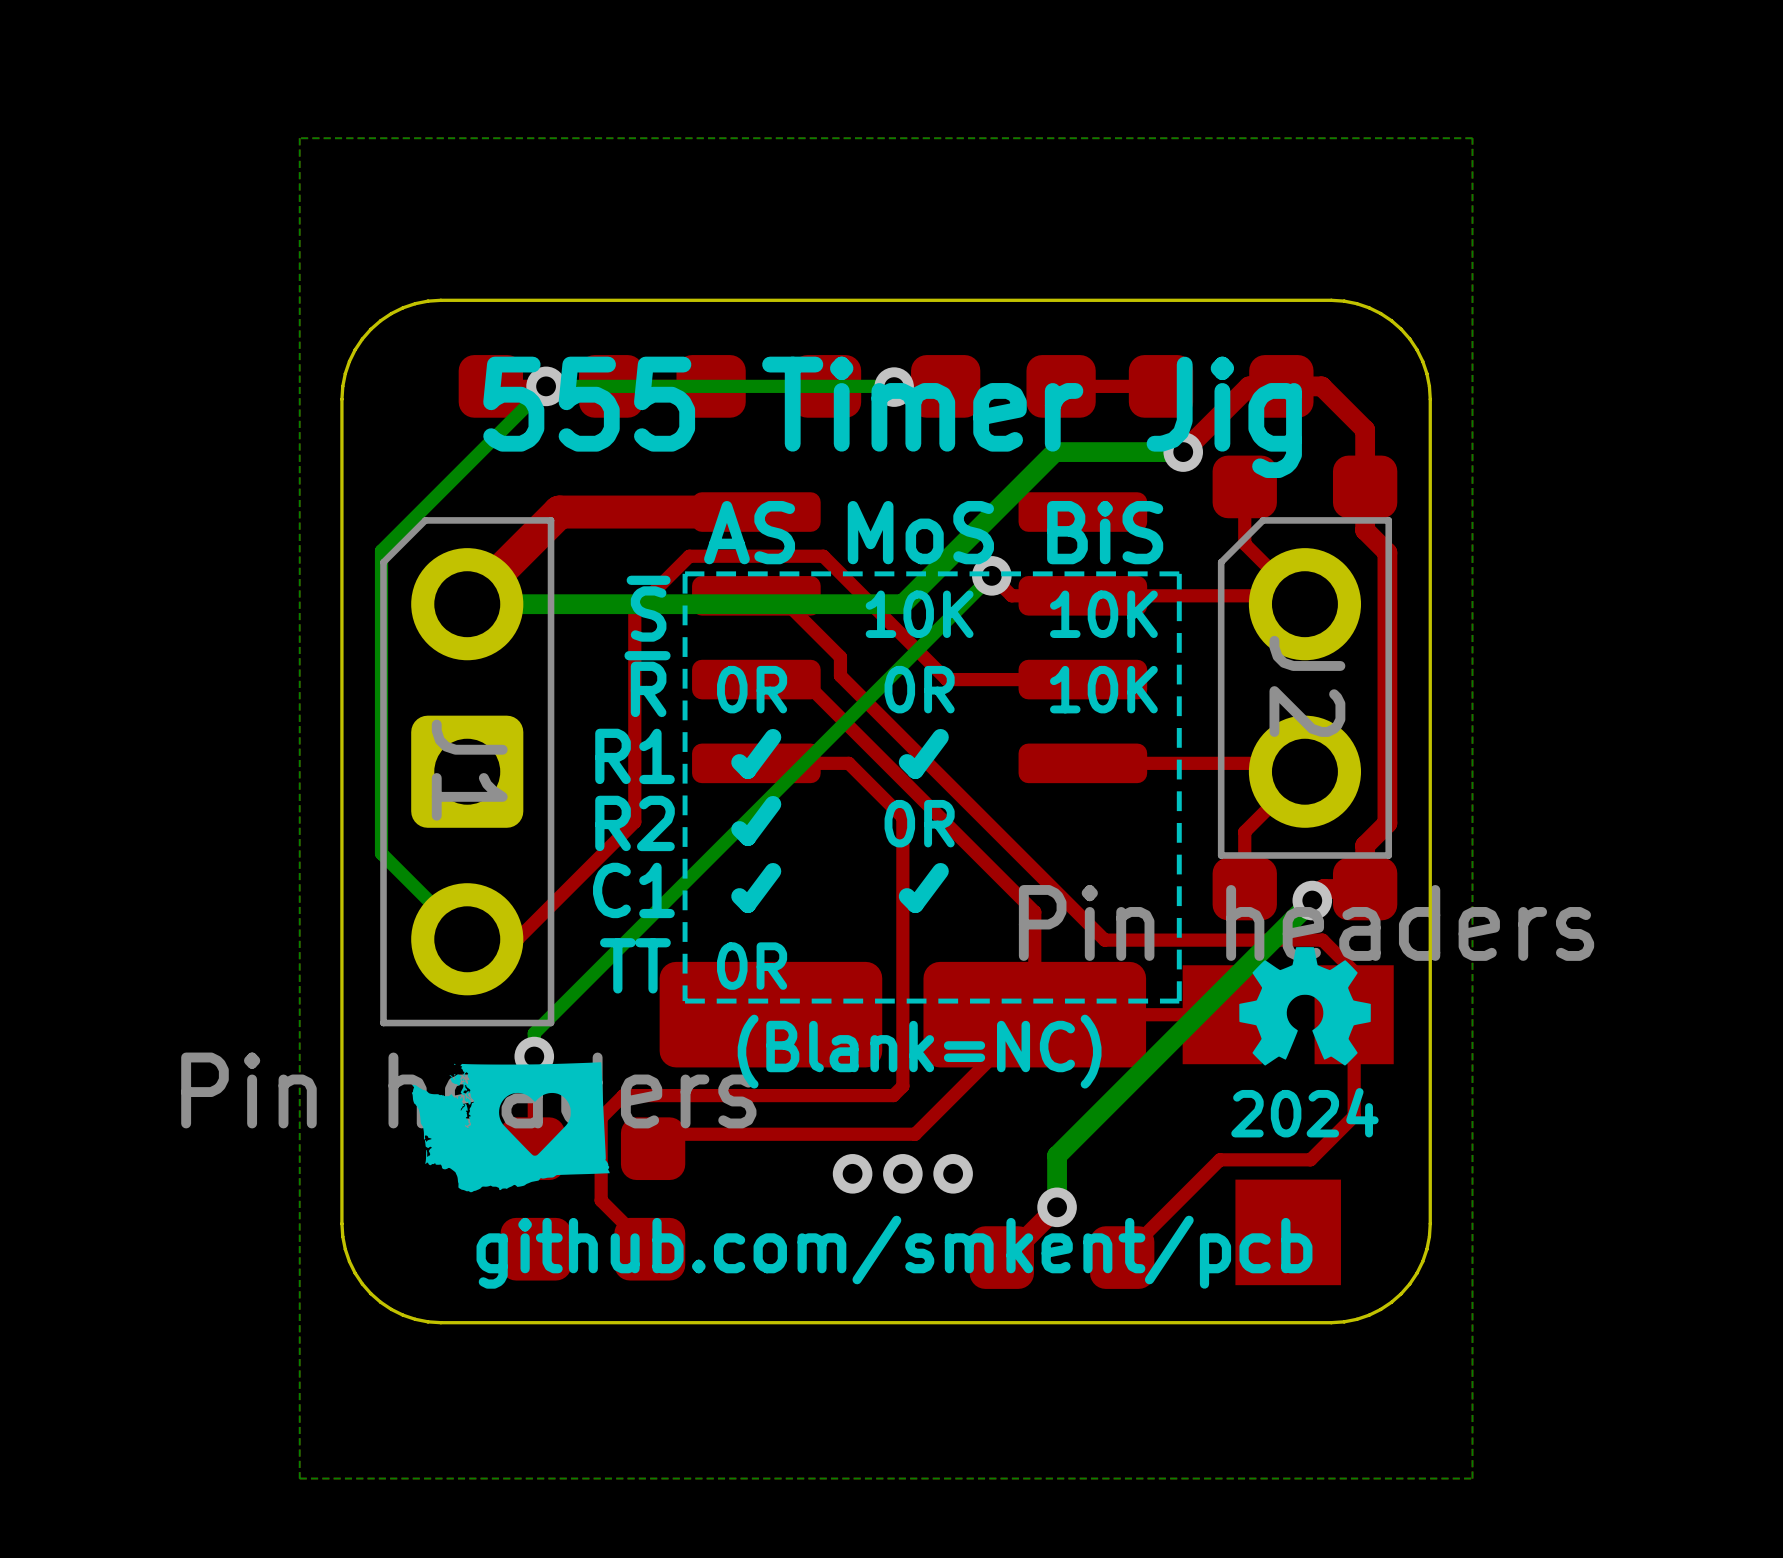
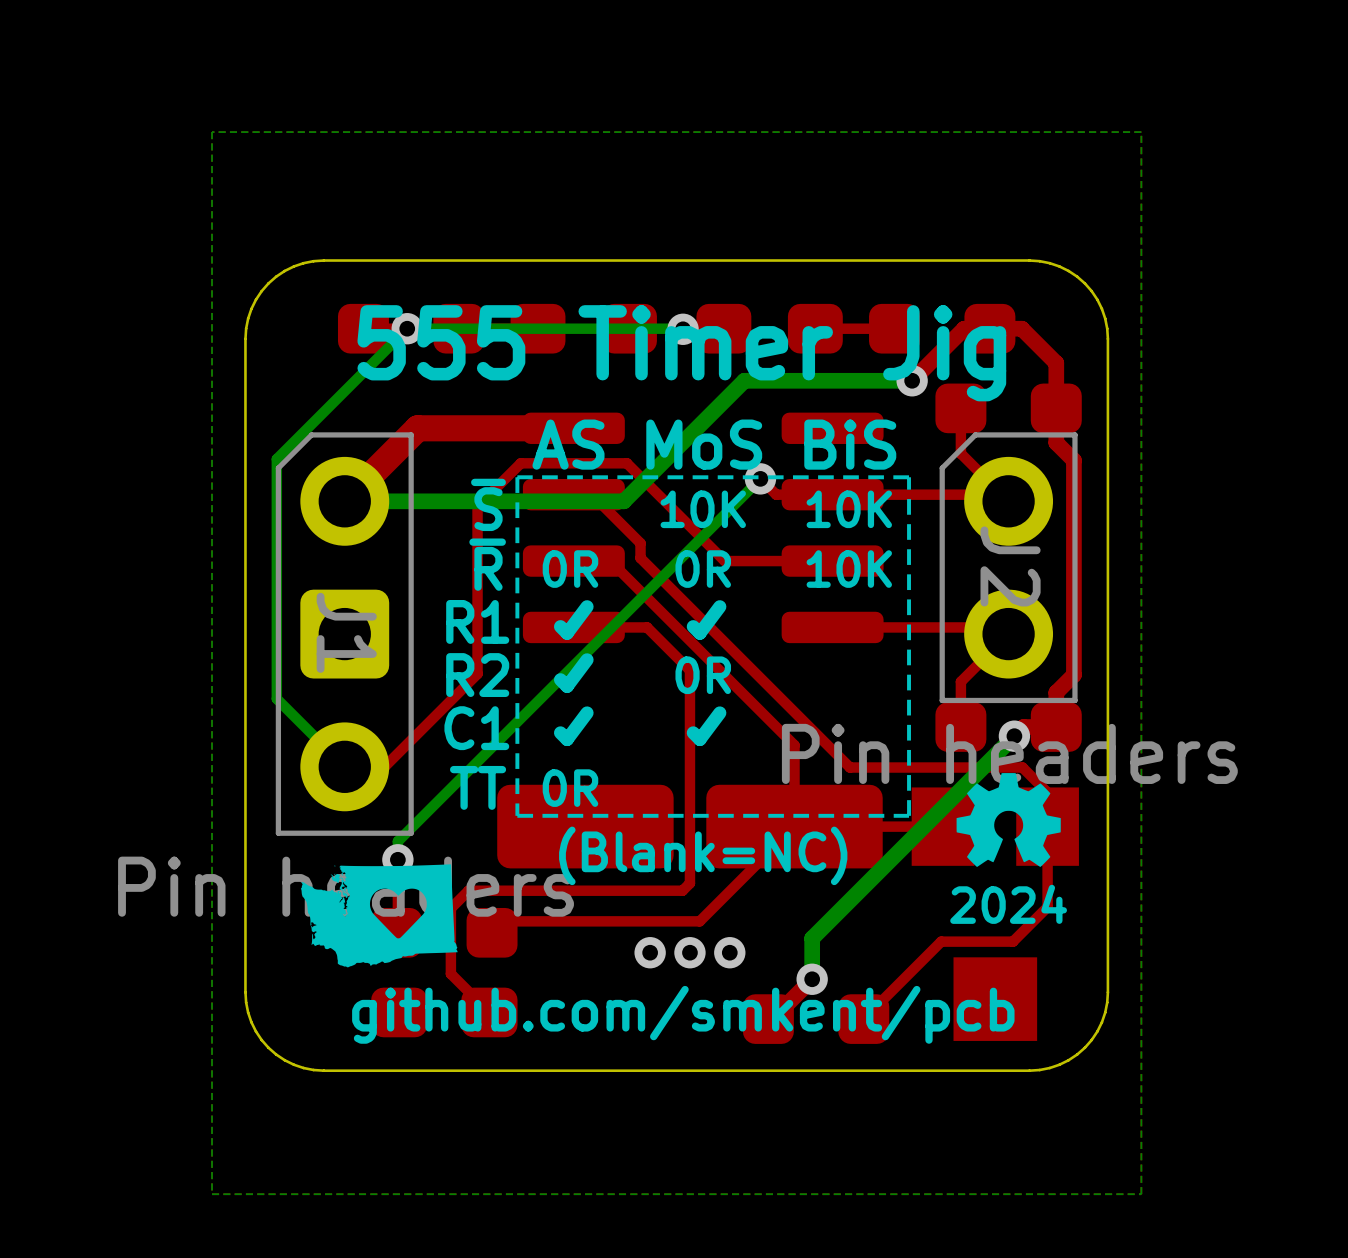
bottom track: (1054, 452) (902, 604) (819, 604) -> (810, 380) (744, 380) (623, 501)

